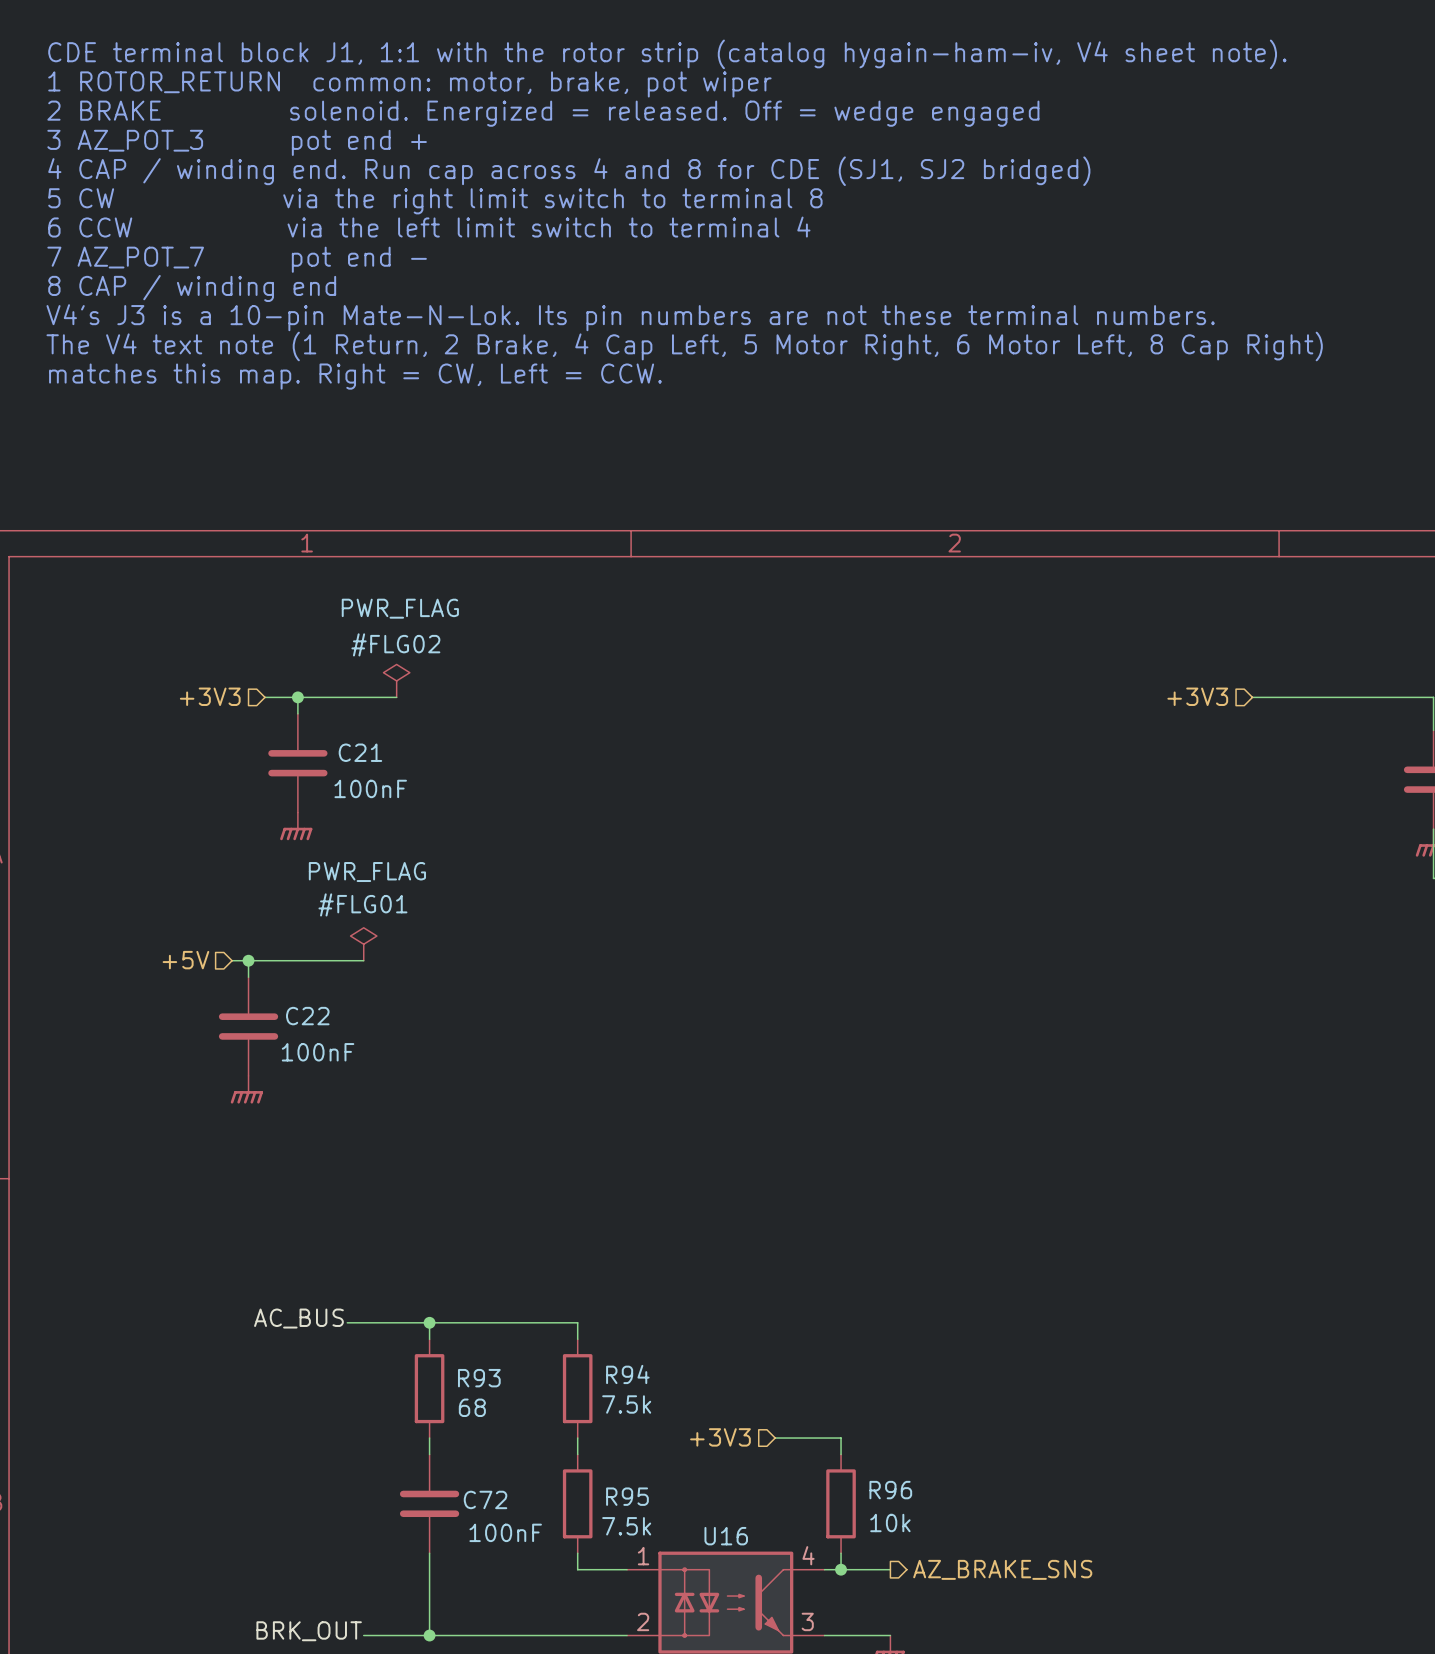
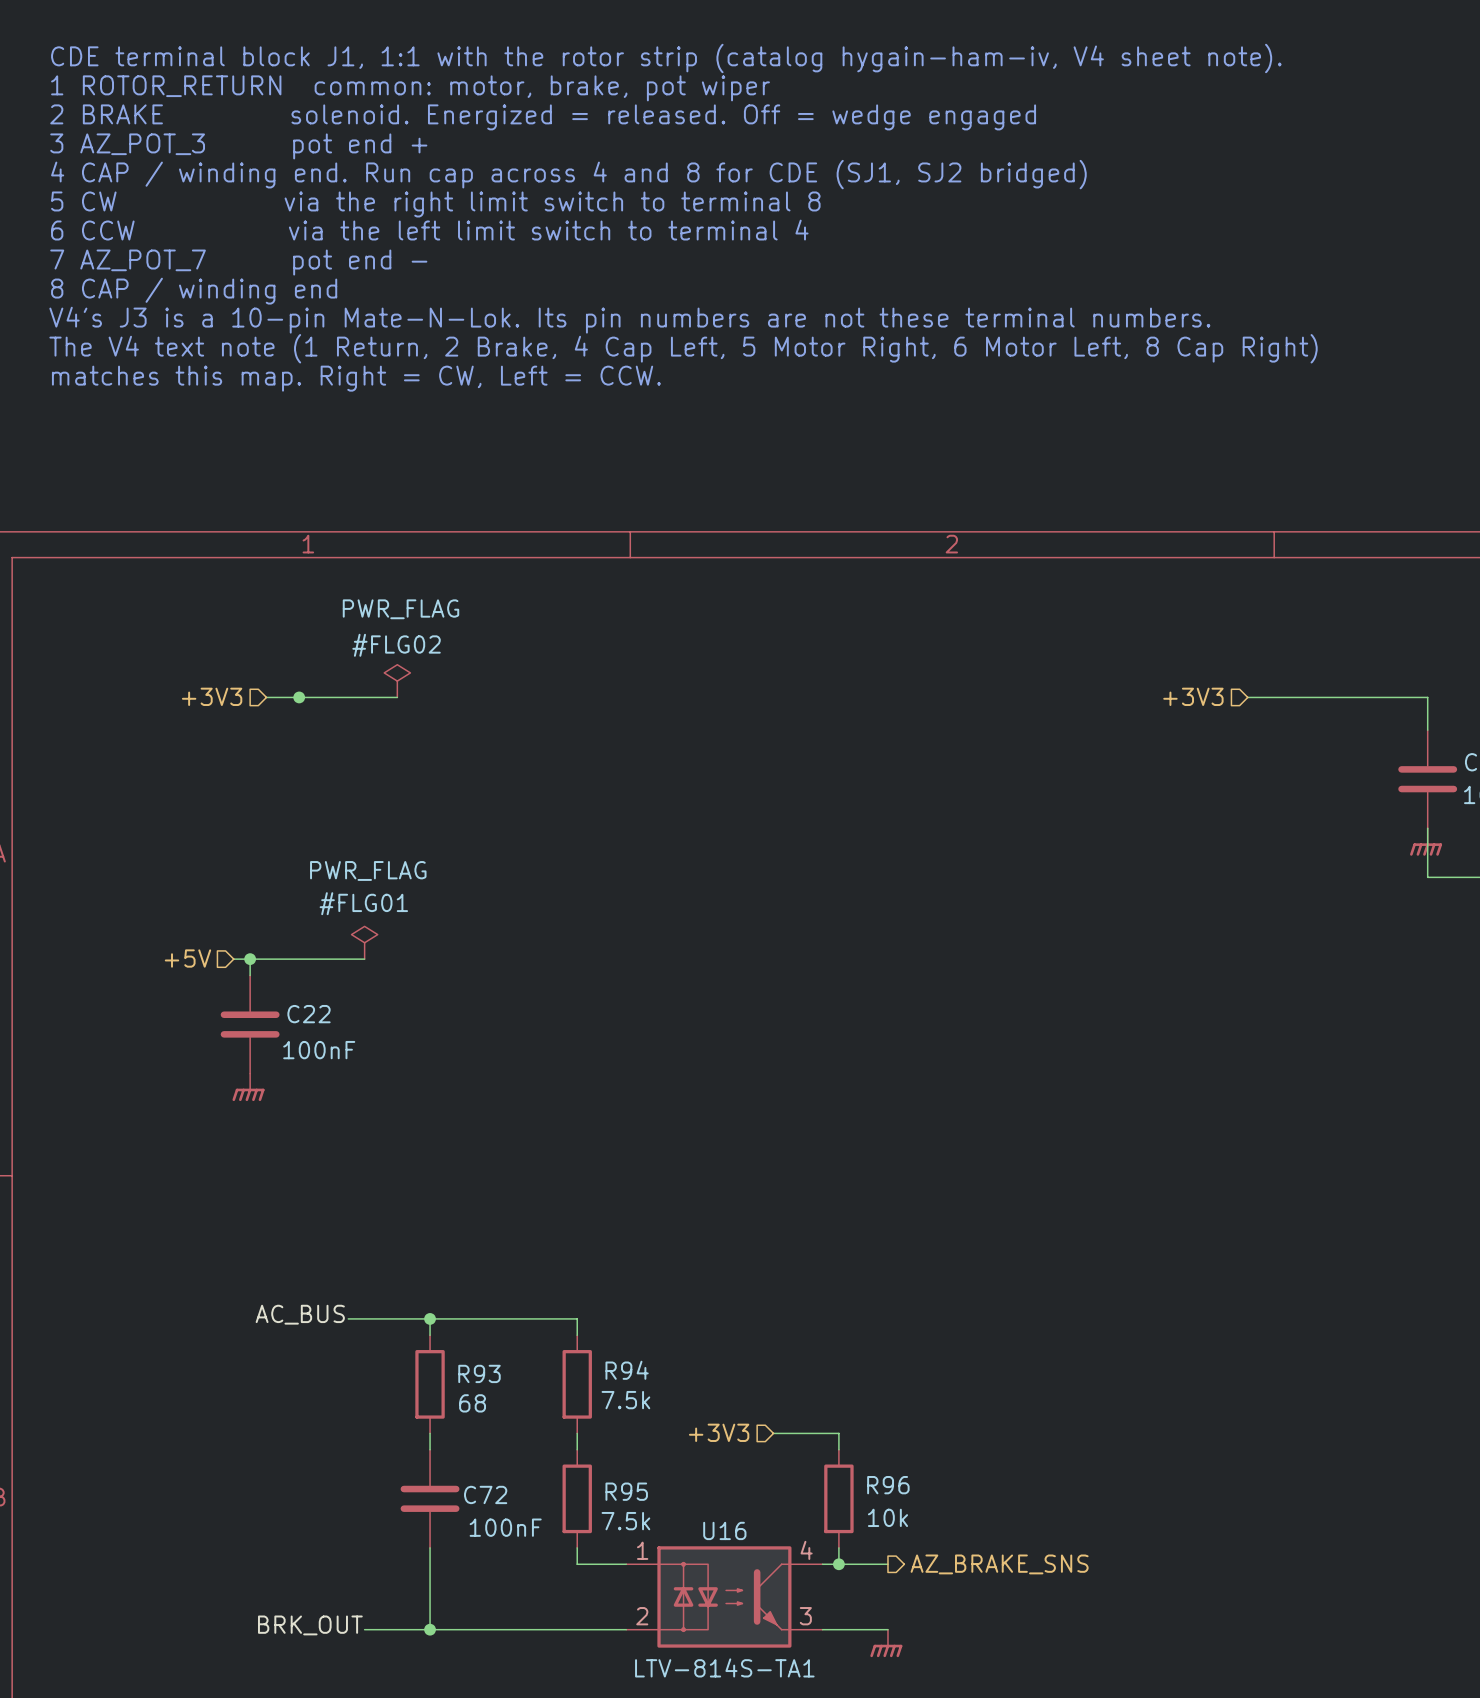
wire: (297, 697) (297, 713) -> none
C21: 100nF (297, 763) -> none
power symbol: (296, 826) -> none

